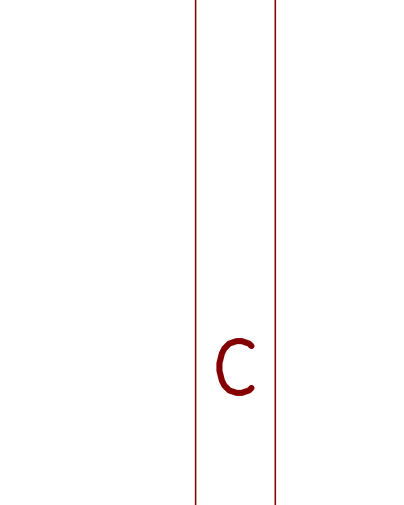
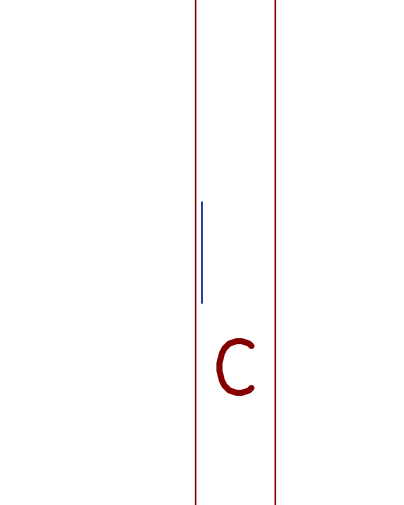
line: none -> (201, 201) (201, 303)

